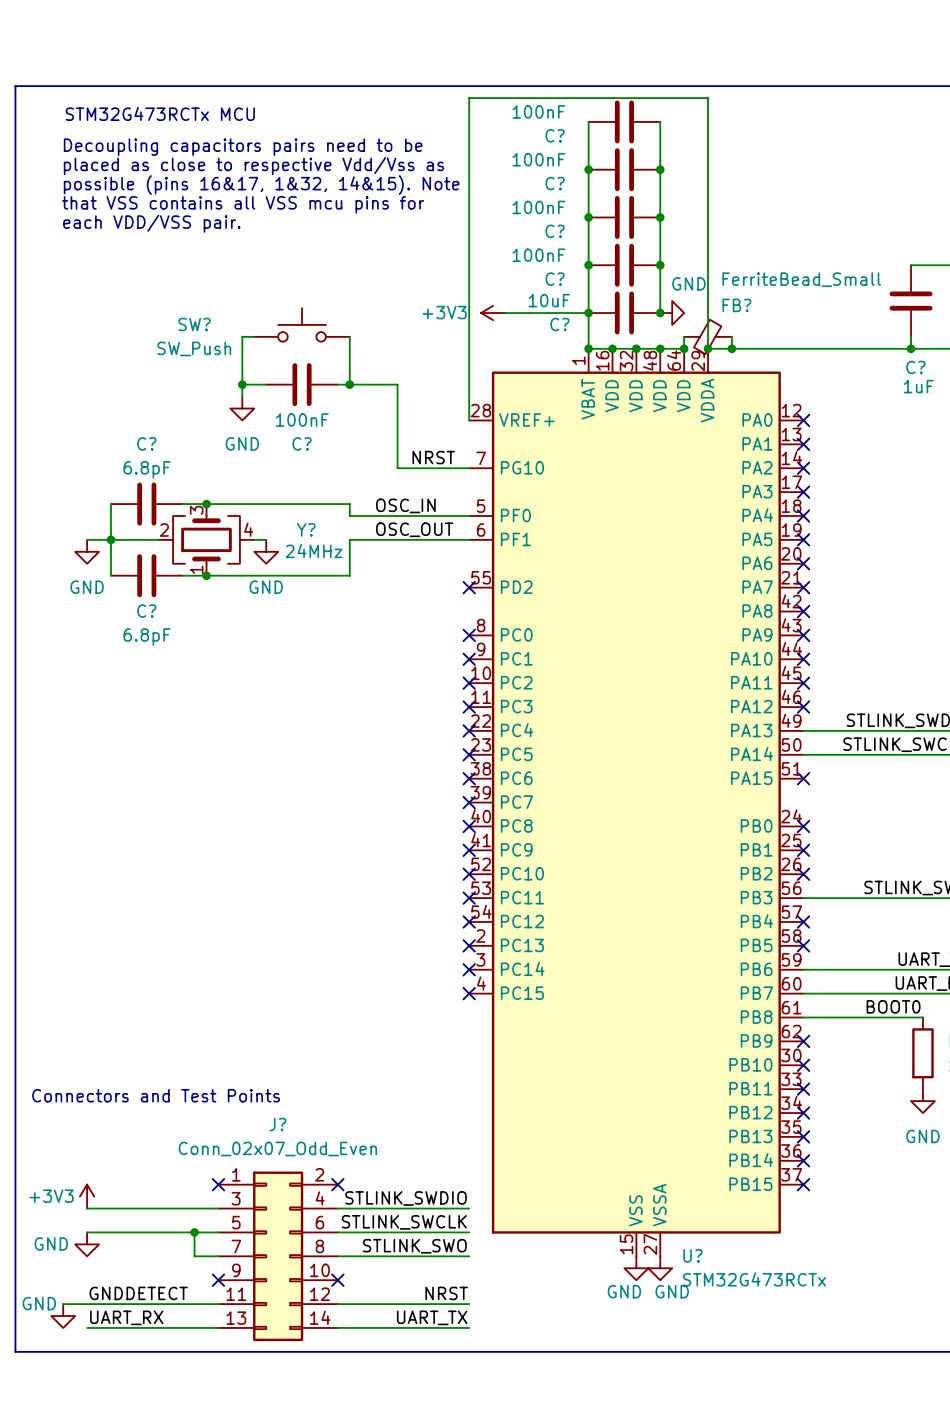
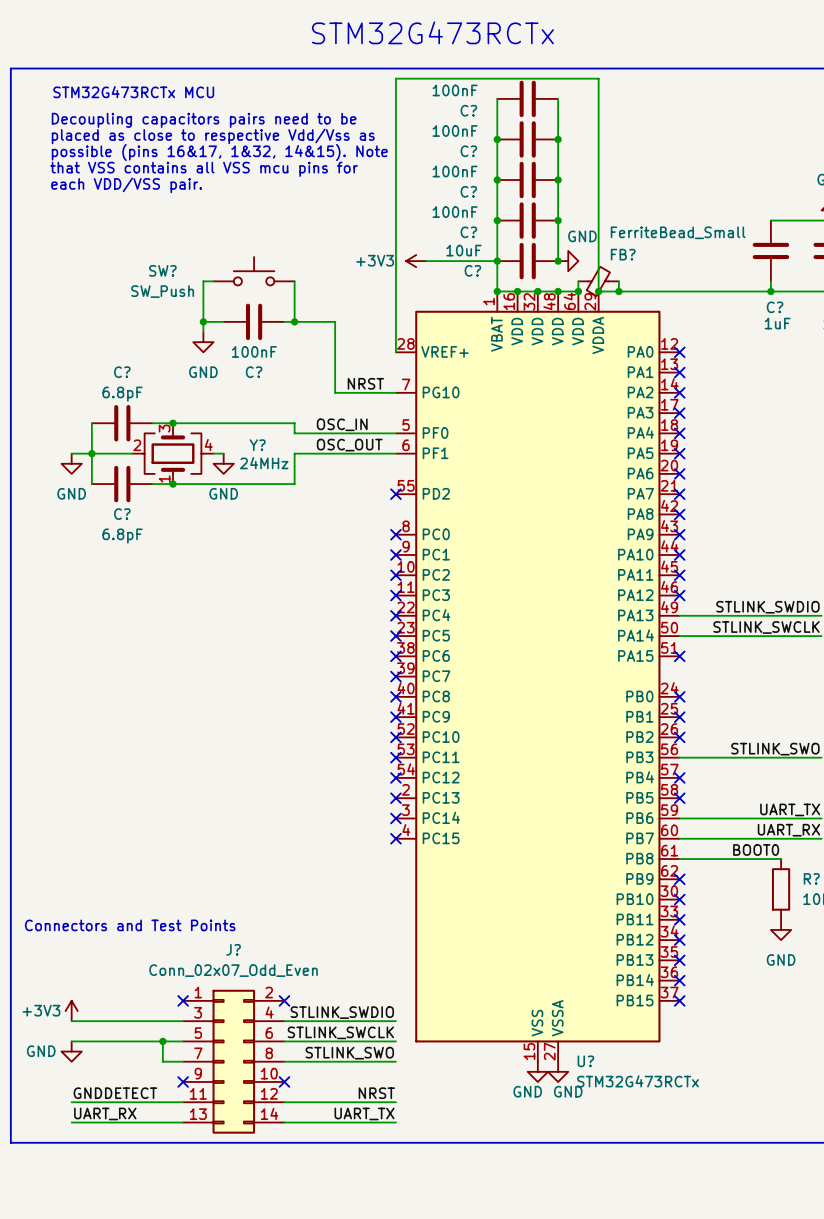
text: none -> STM32G473RCTx (432, 32)
wire: (63, 1304) (87, 1304) -> none
power symbol: GND (63, 1316) -> none

